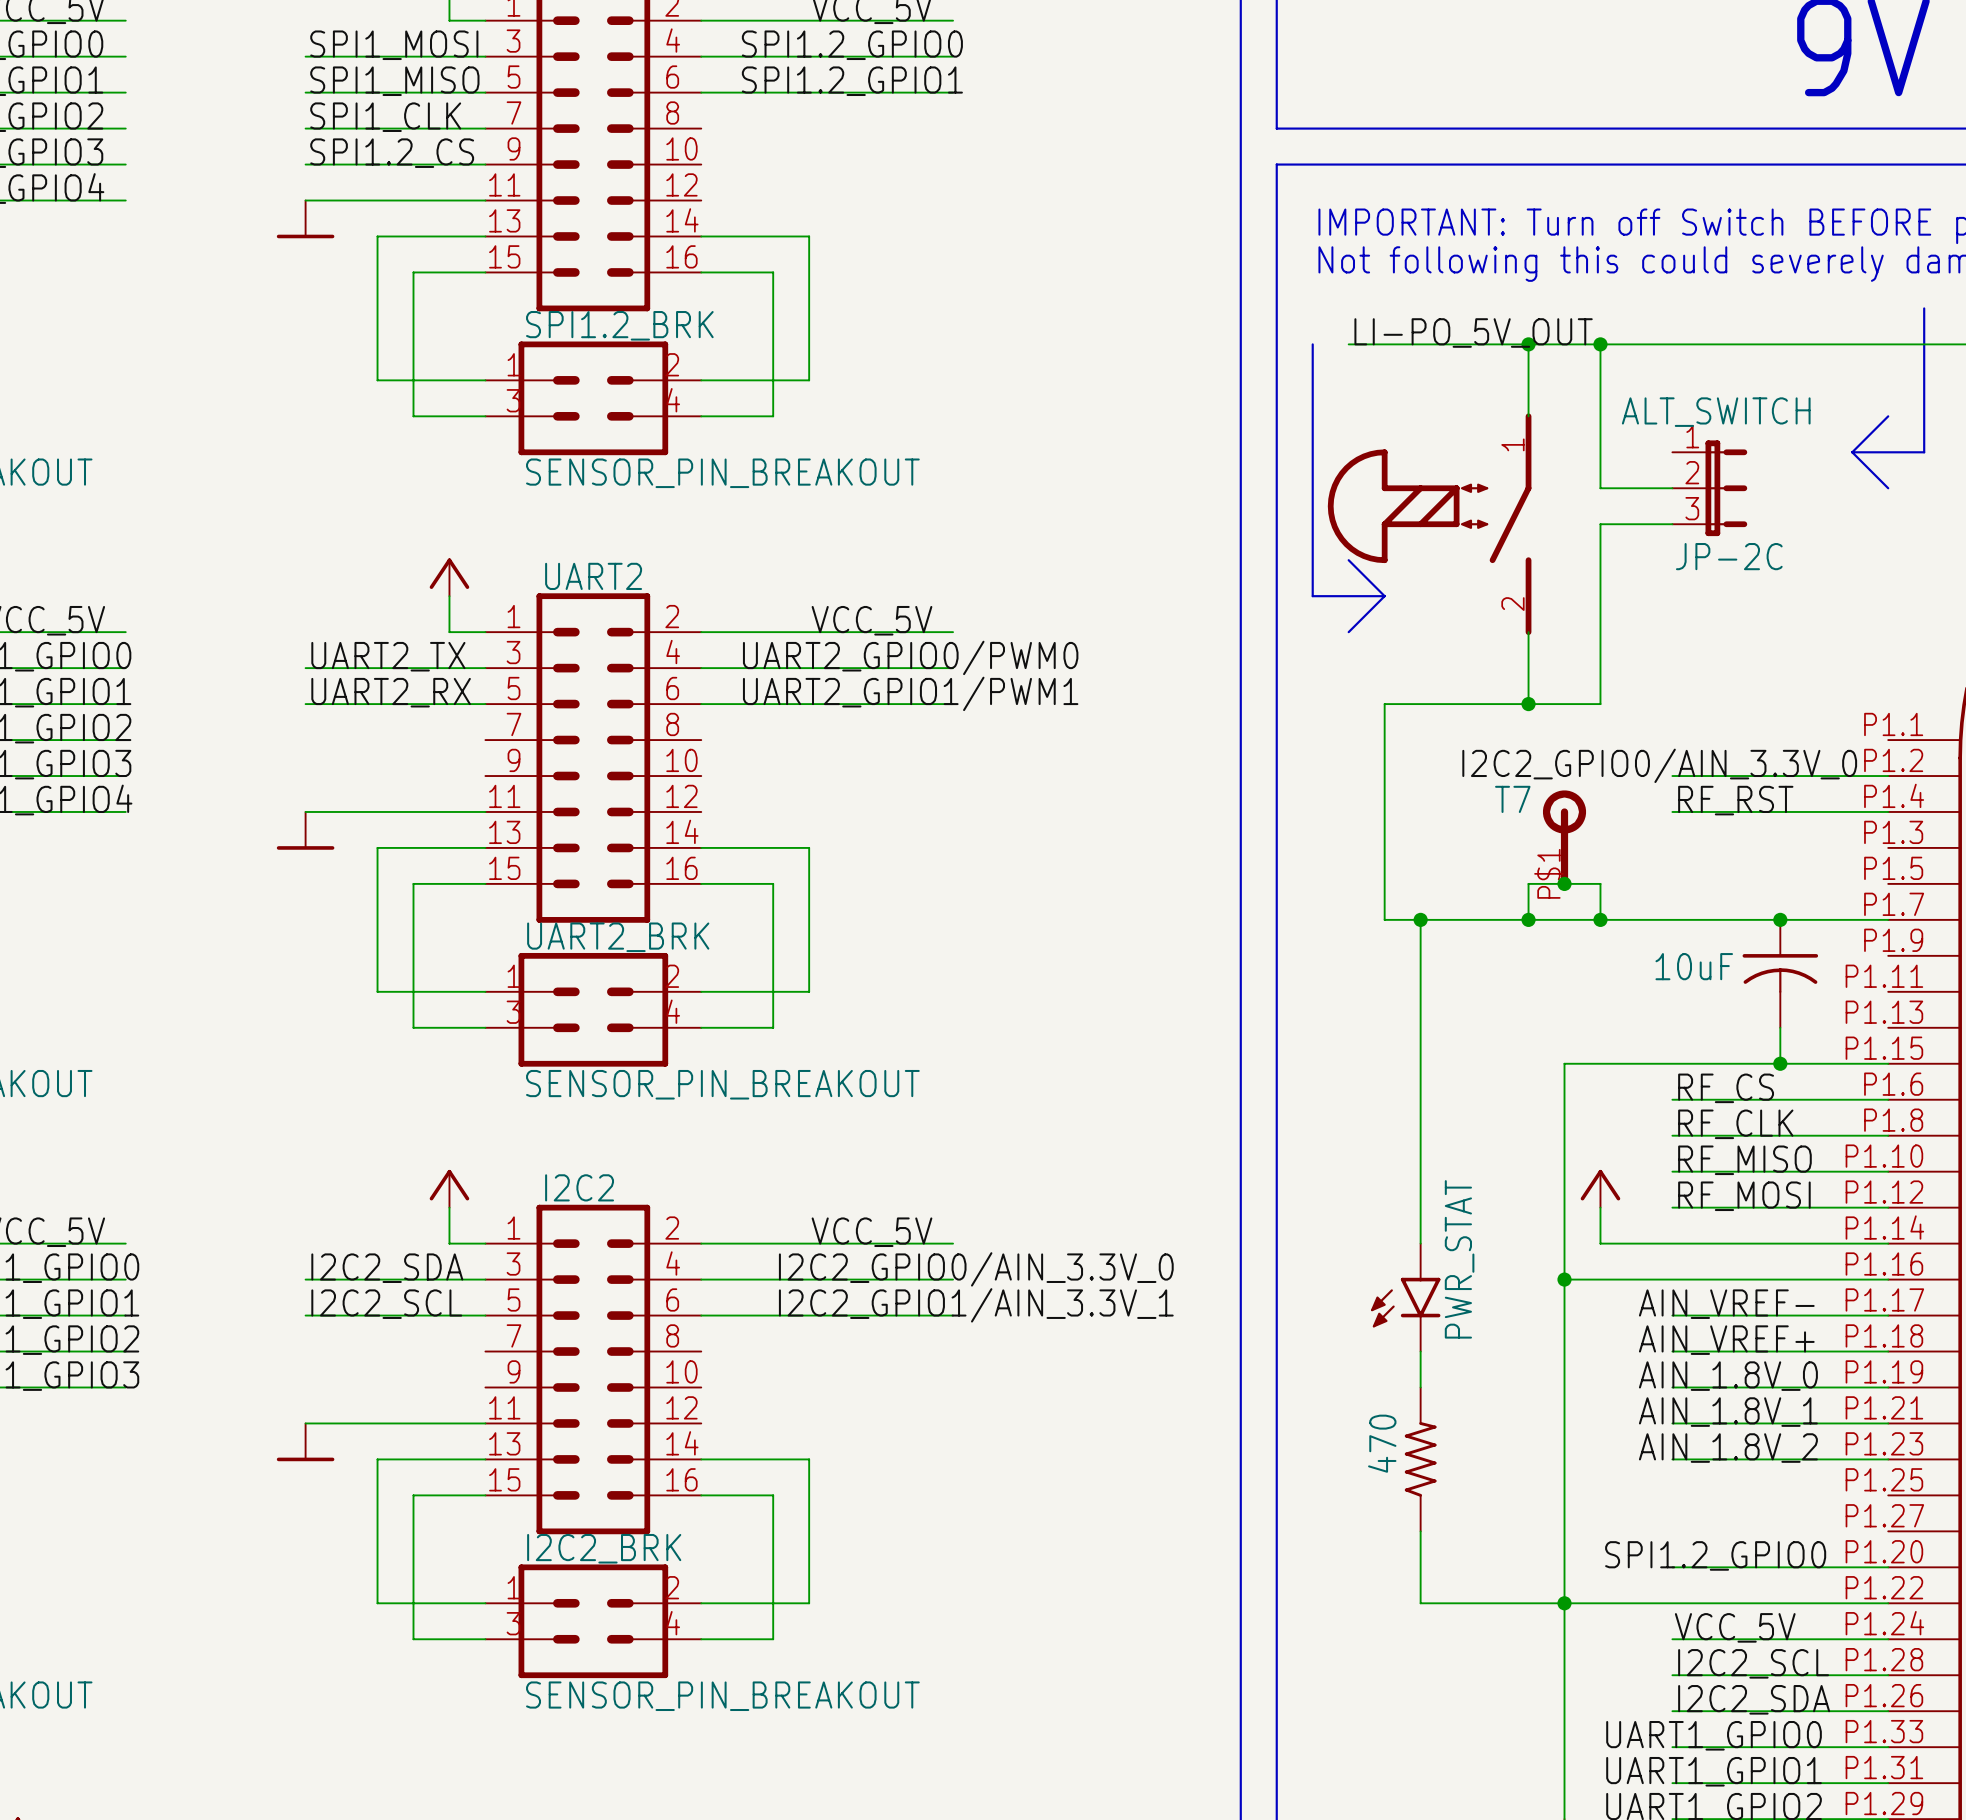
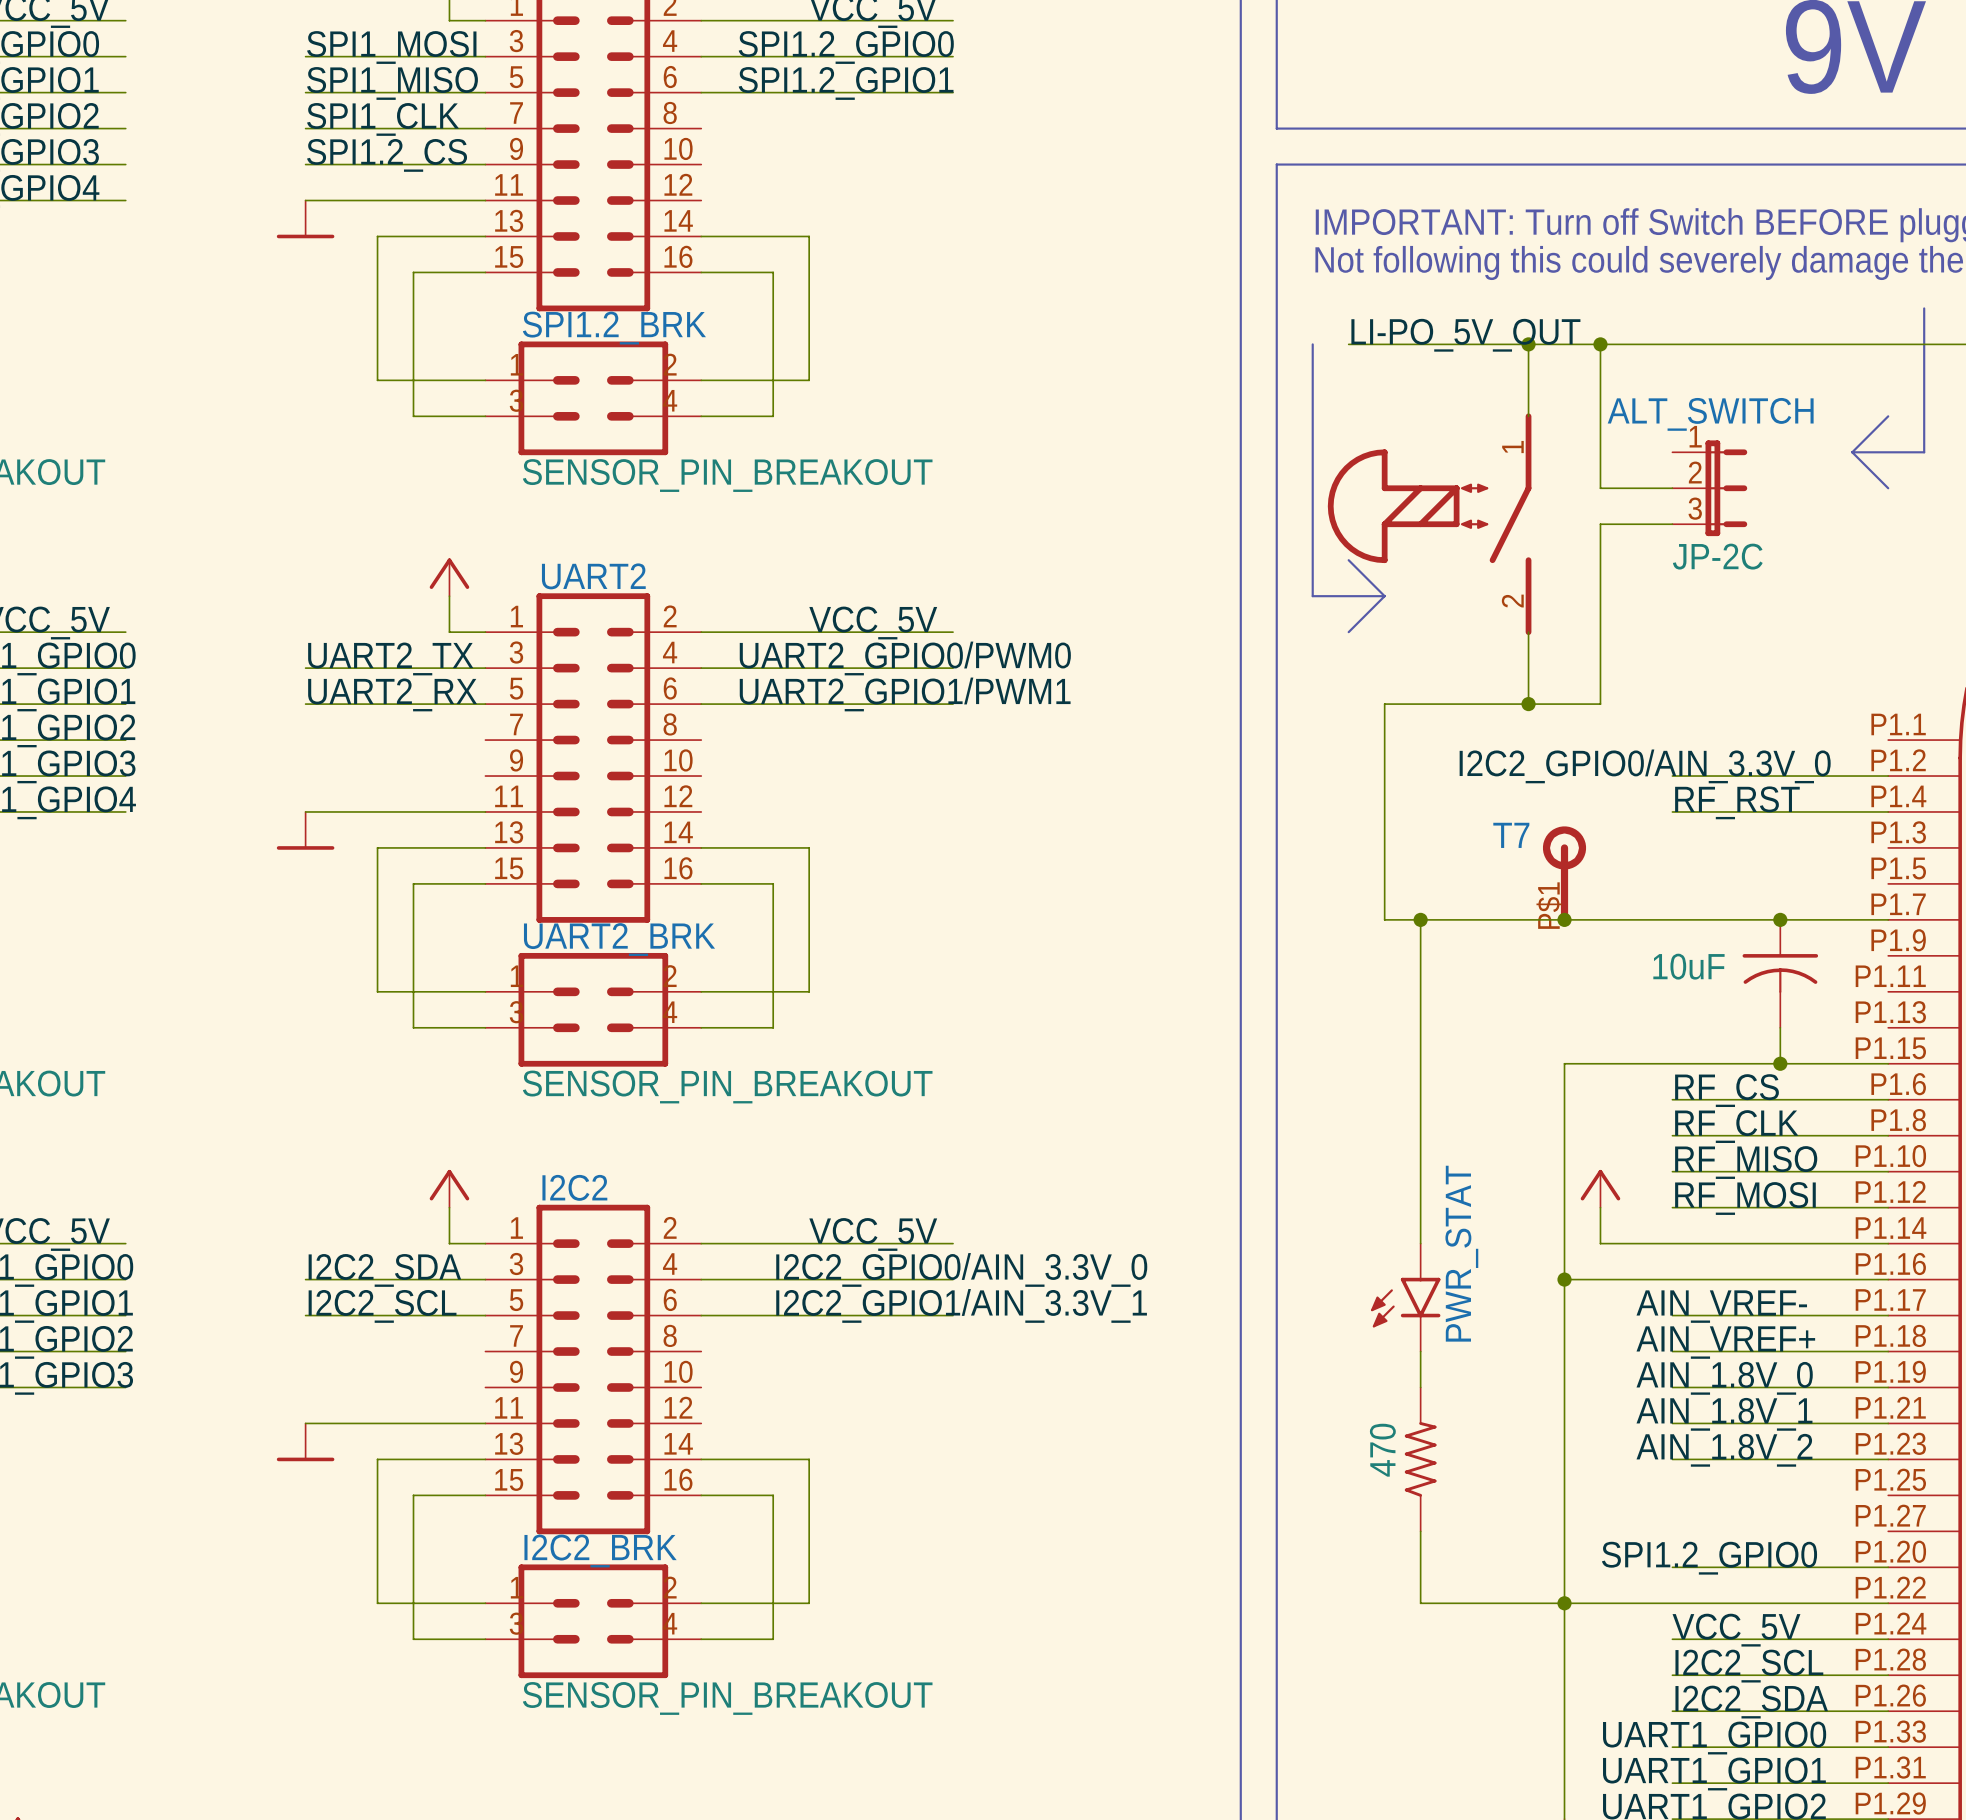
T7 position: (1564, 838) -> (1564, 874)
junction: (1564, 883) -> none
wire: (1528, 919) (1528, 883) (1600, 883) (1600, 919) -> none
junction: (1528, 919) -> none
junction: none -> (1564, 919)
junction: (1600, 919) -> none

